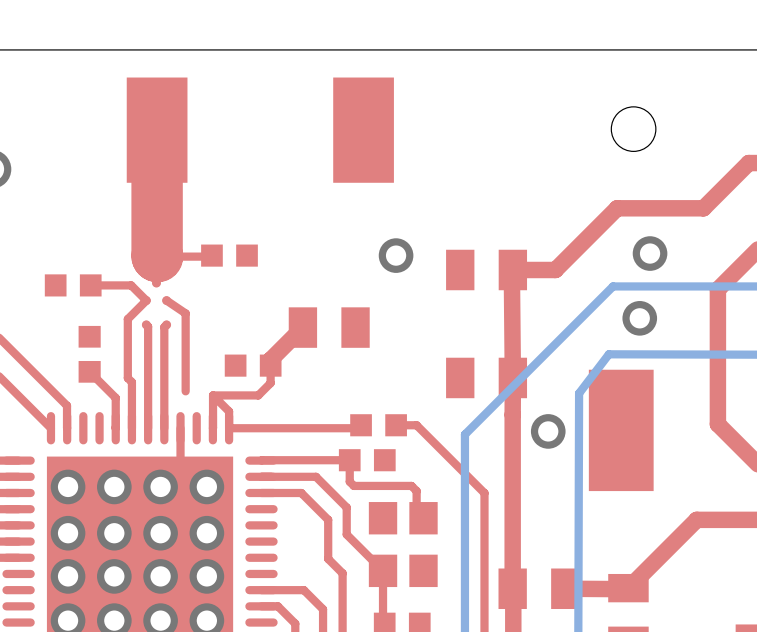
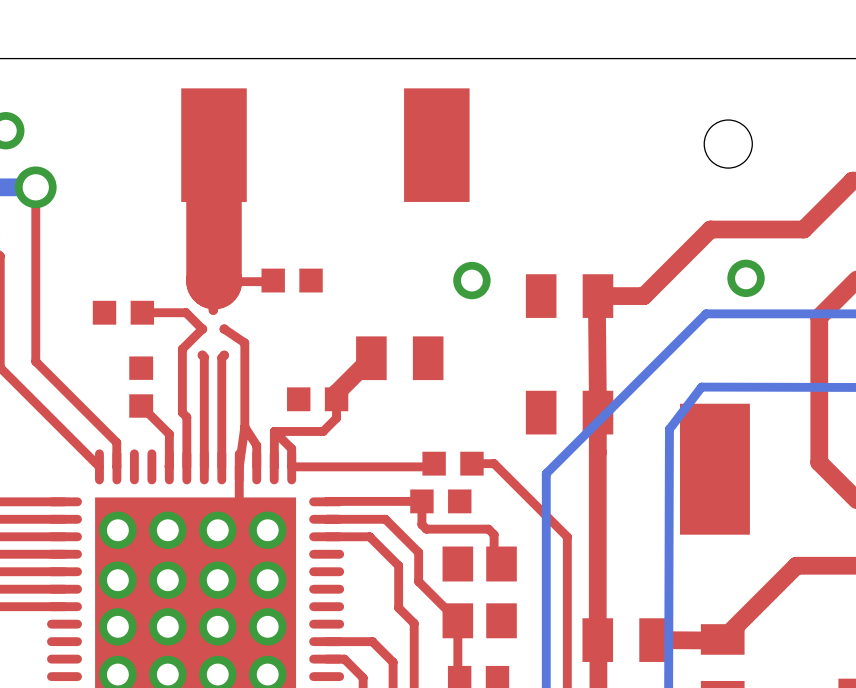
via: (639, 318) -> none
top track: none -> (256, 466) (256, 445) (244, 427) (239, 466)
via: (548, 431) -> none

